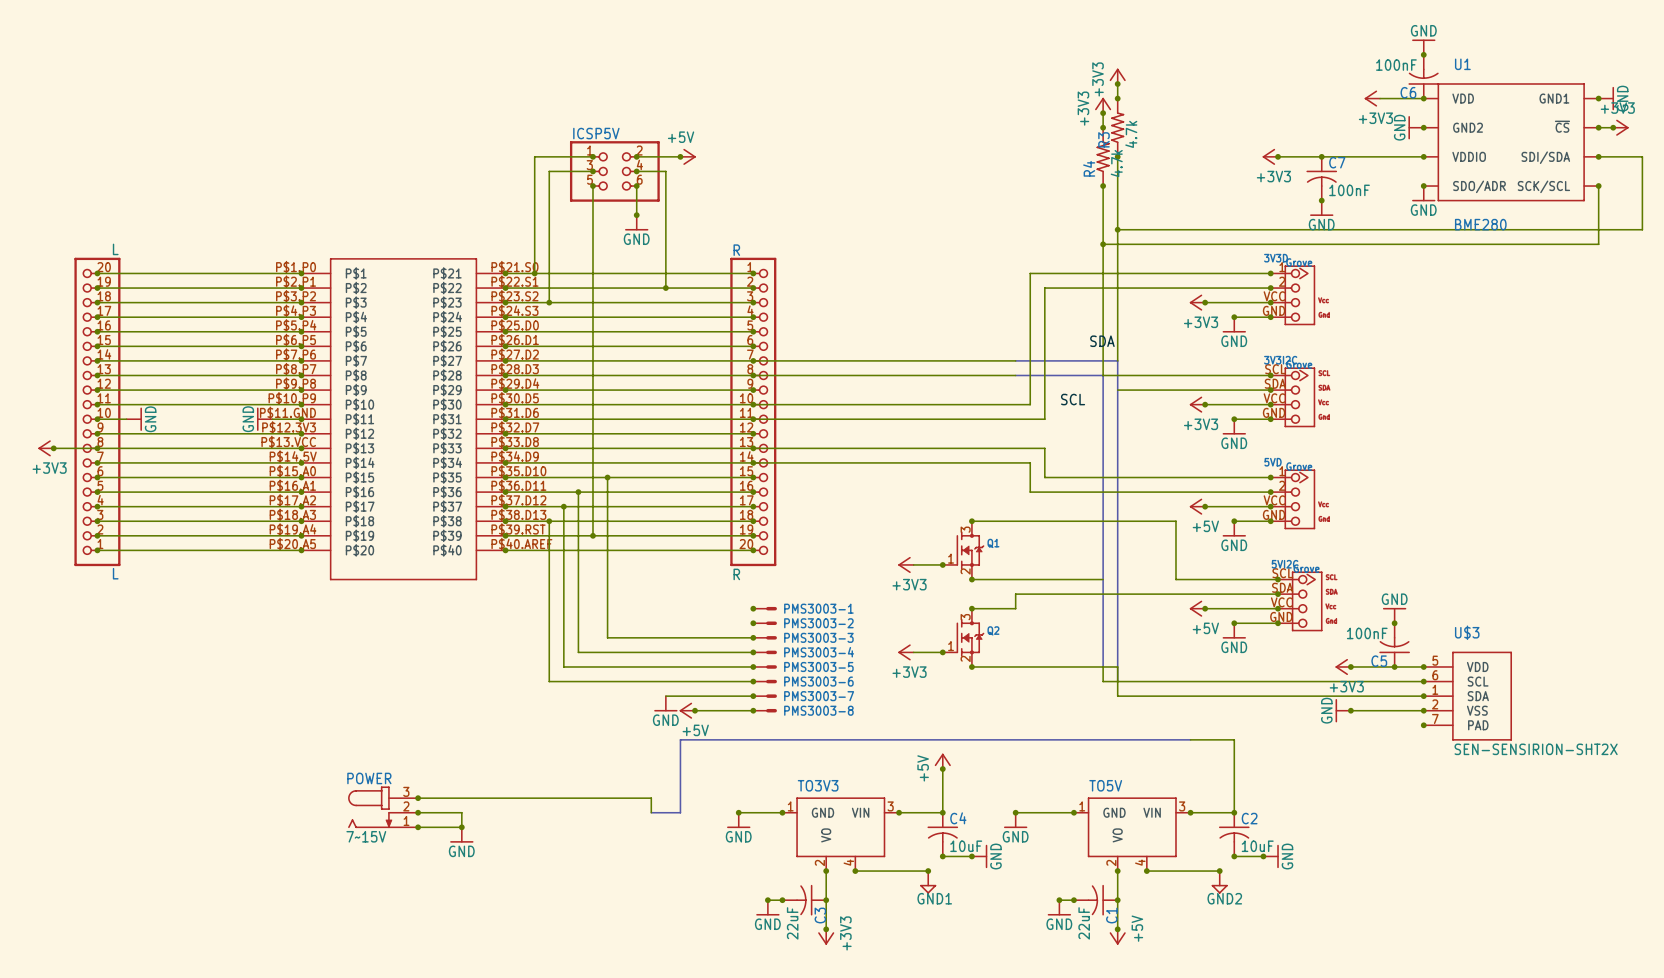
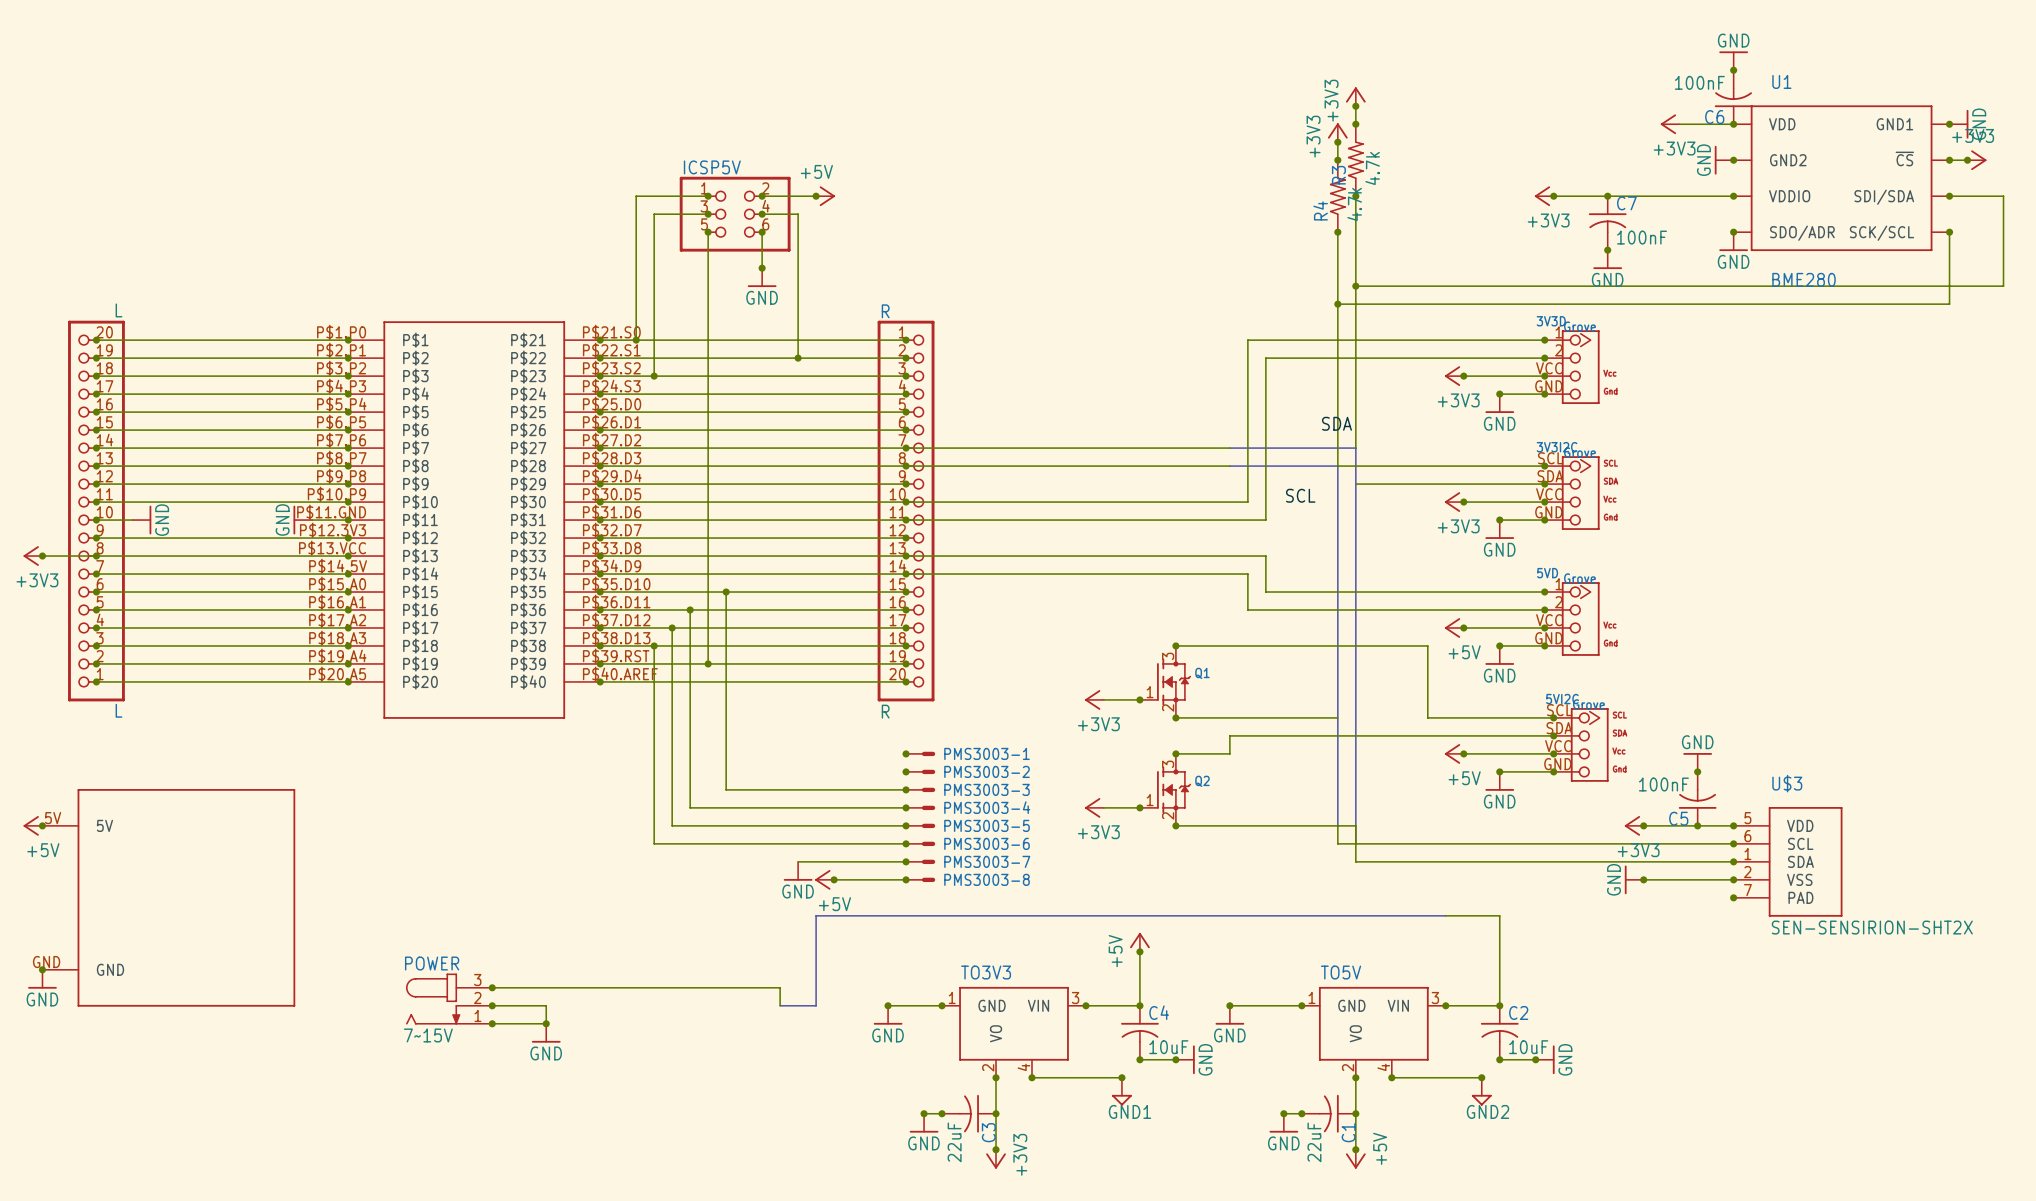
power symbol: none -> +5V (33, 825)
junction: none -> (42, 825)
part: none -> (168, 897)
junction: none -> (42, 969)
power symbol: none -> GND (42, 979)

